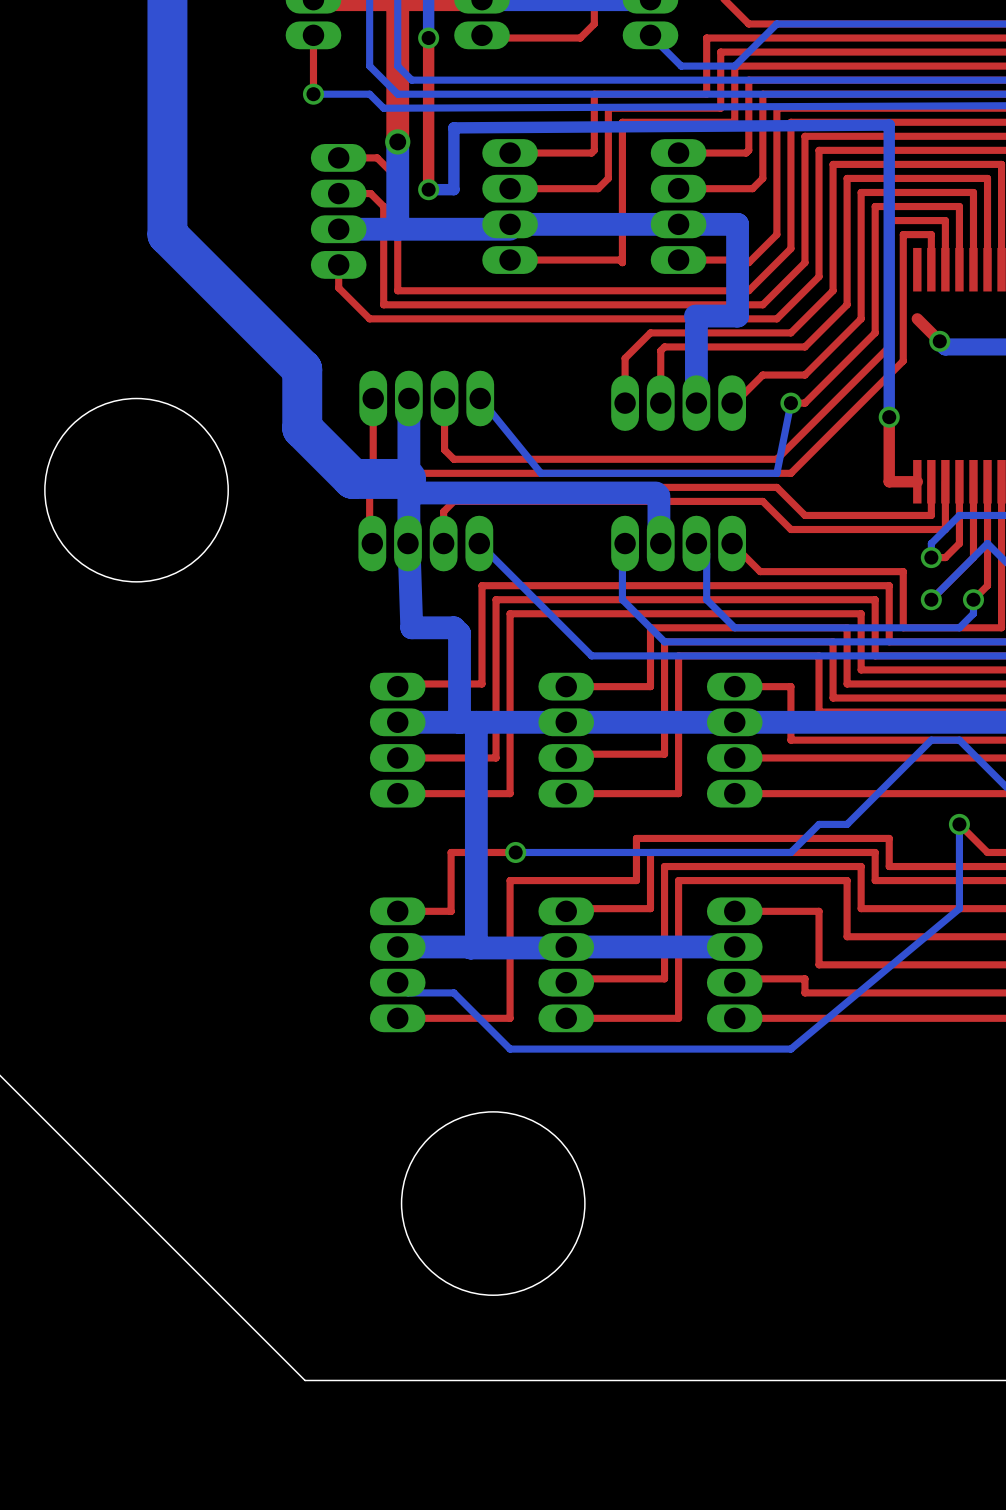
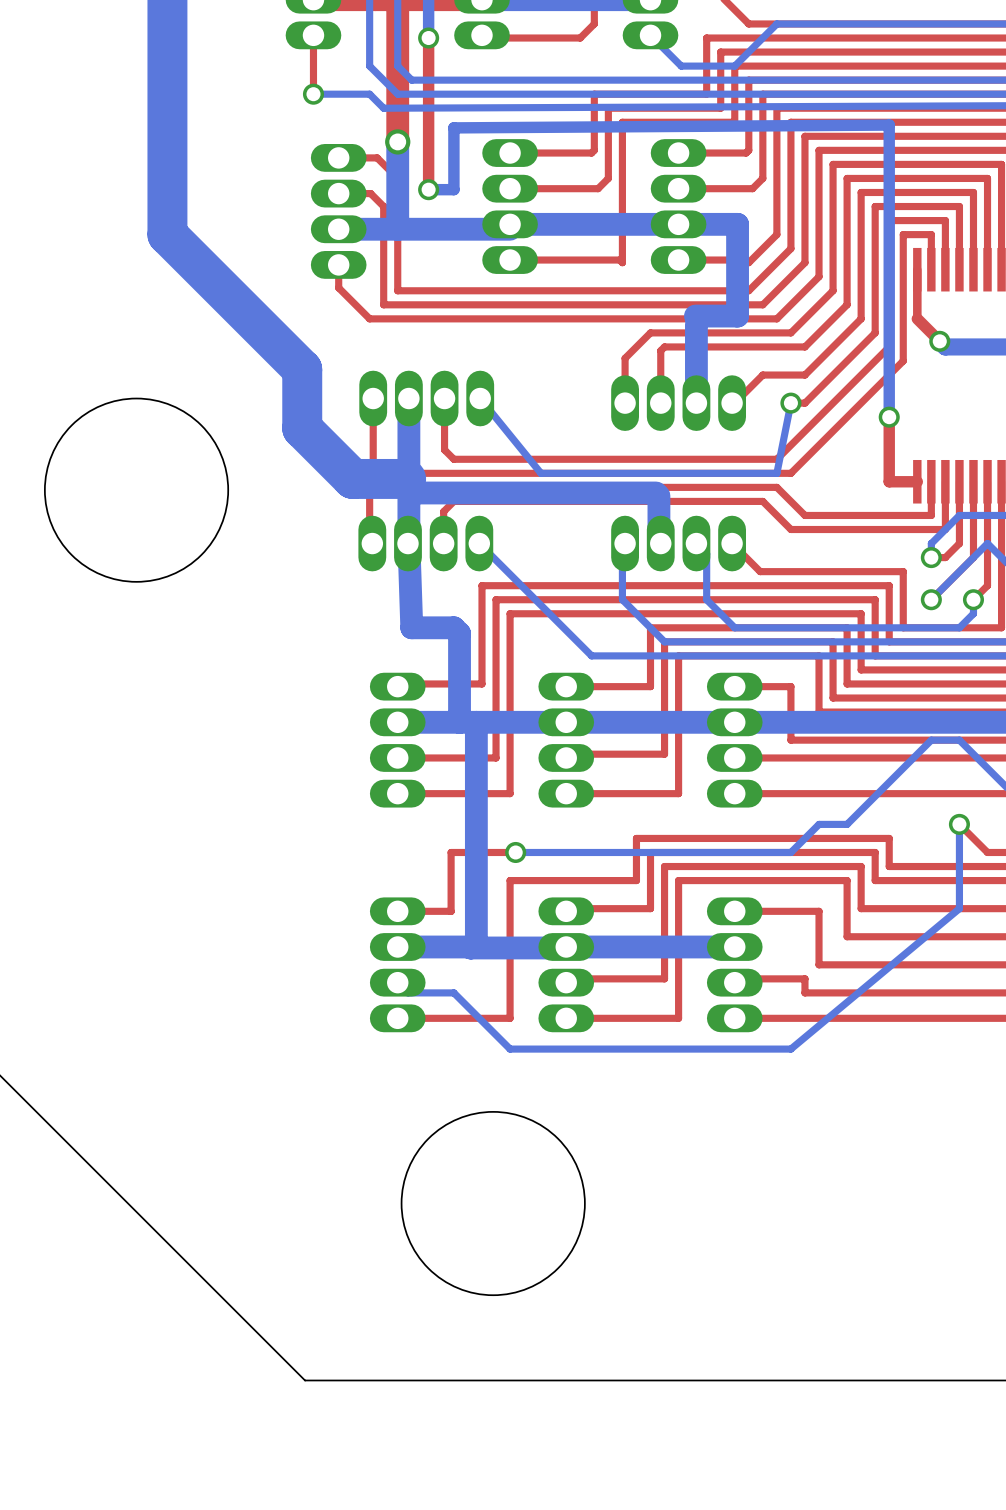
top track: none -> (917, 269) (917, 318)

